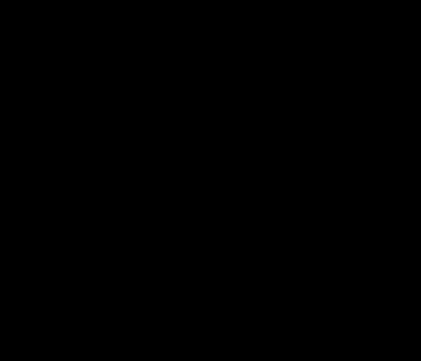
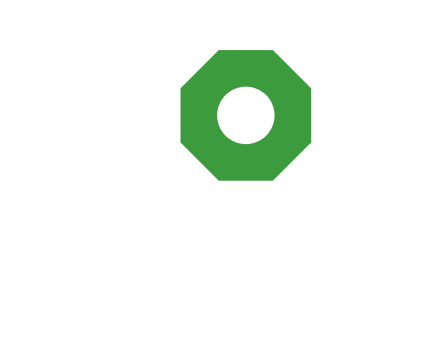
part: none -> (245, 115)

